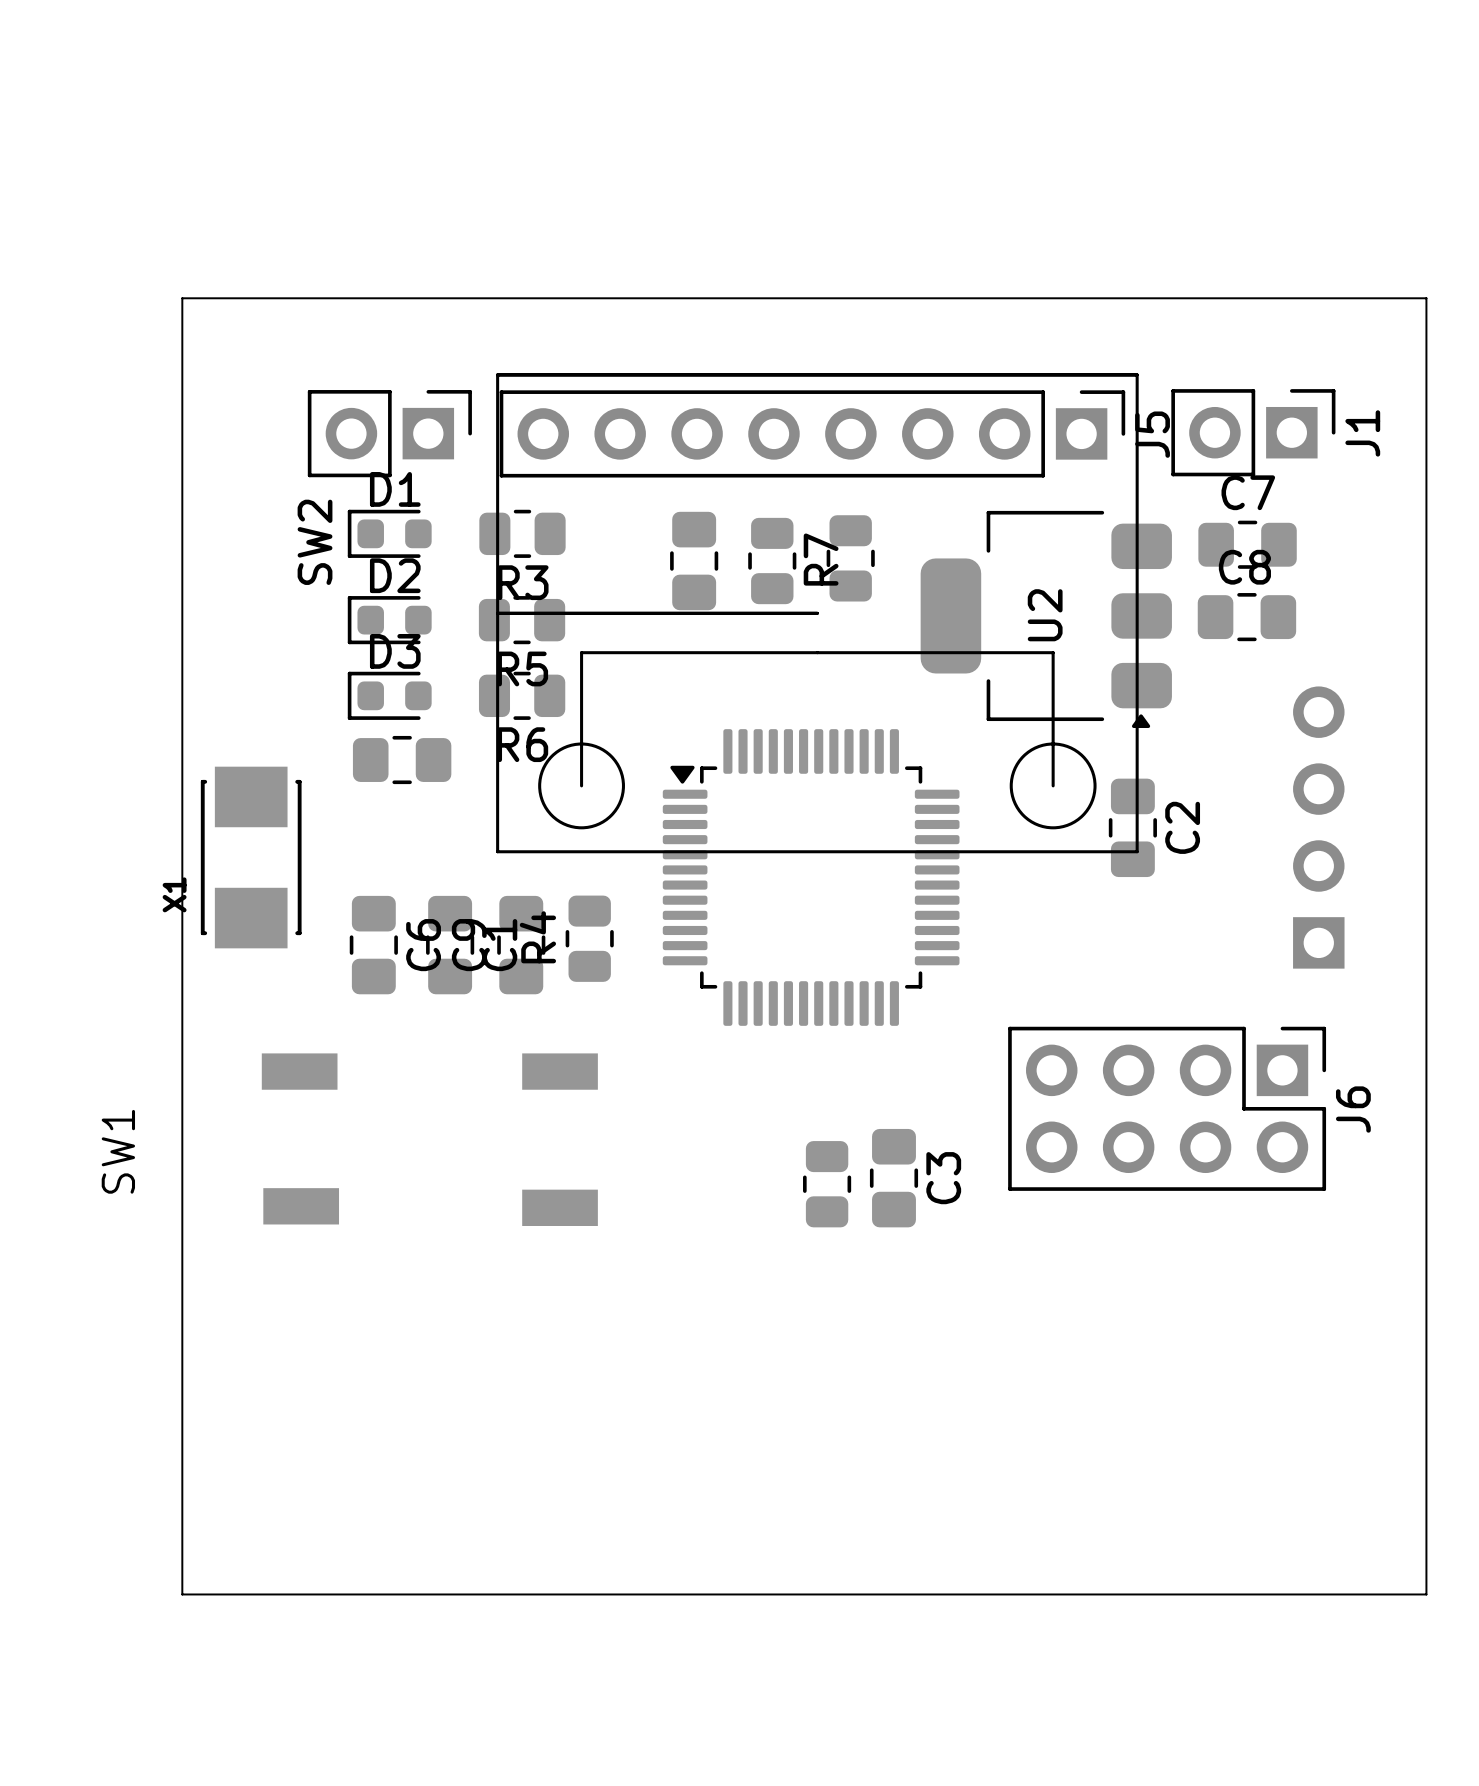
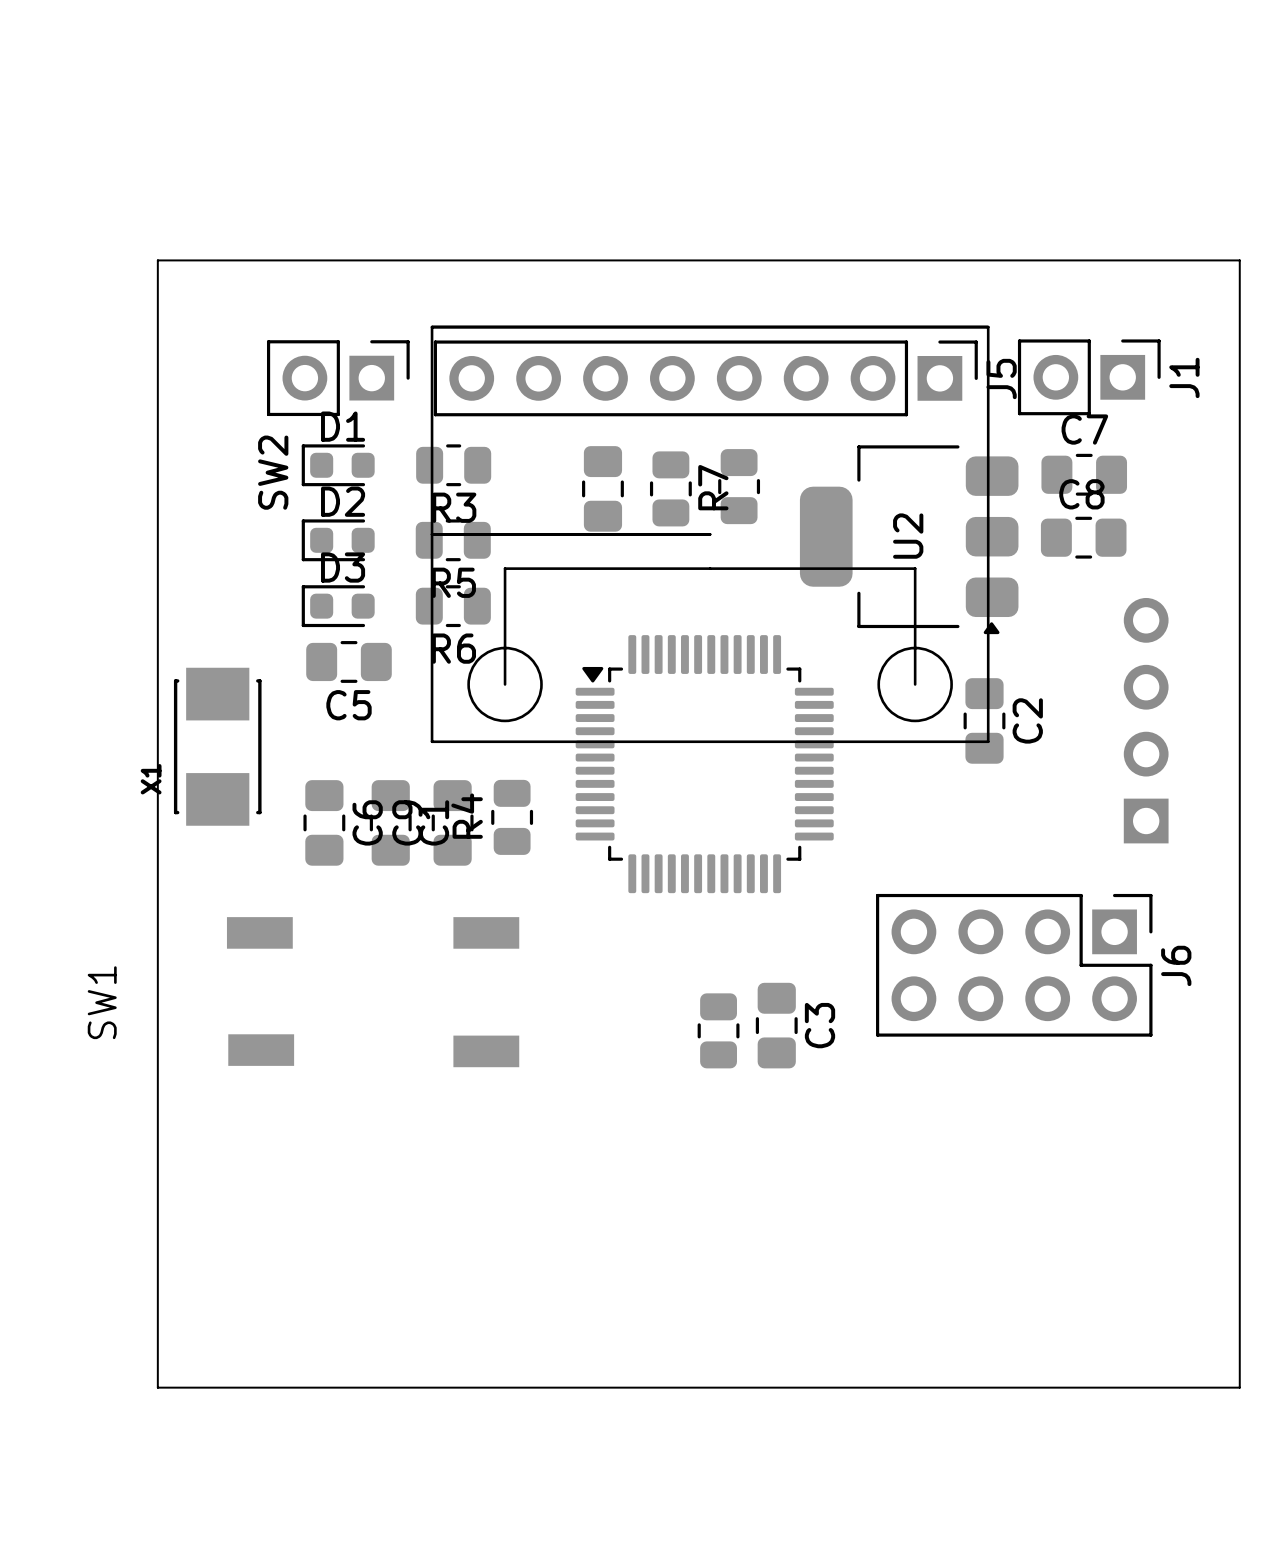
C5 name: none -> C5 (349, 705)

